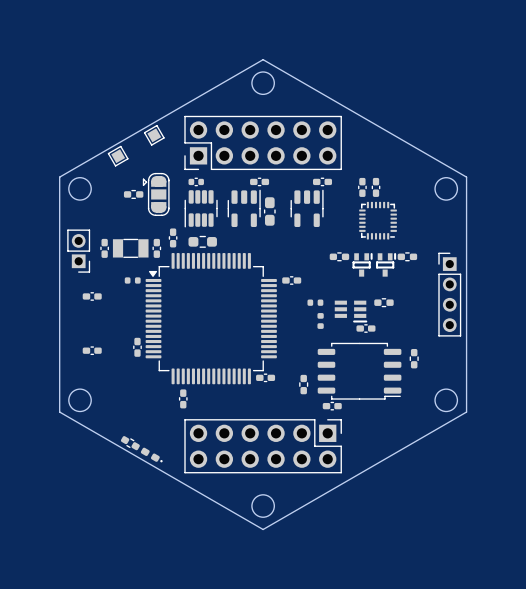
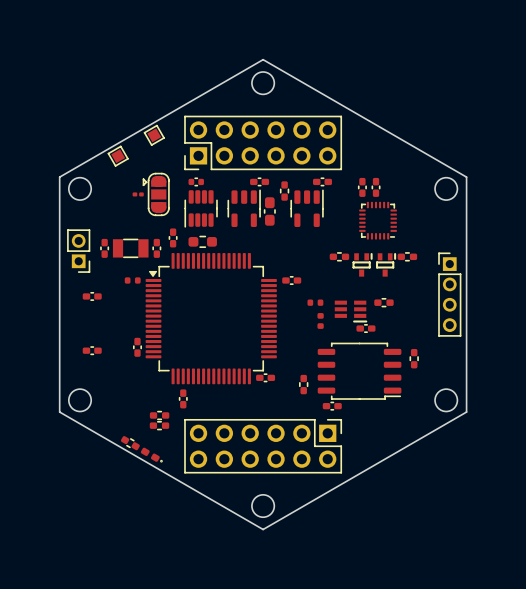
part footprint: [123, 189, 144, 199] -> [132, 192, 144, 197]
part: none -> (284, 191)
part: none -> (159, 415)
part: none -> (159, 425)

